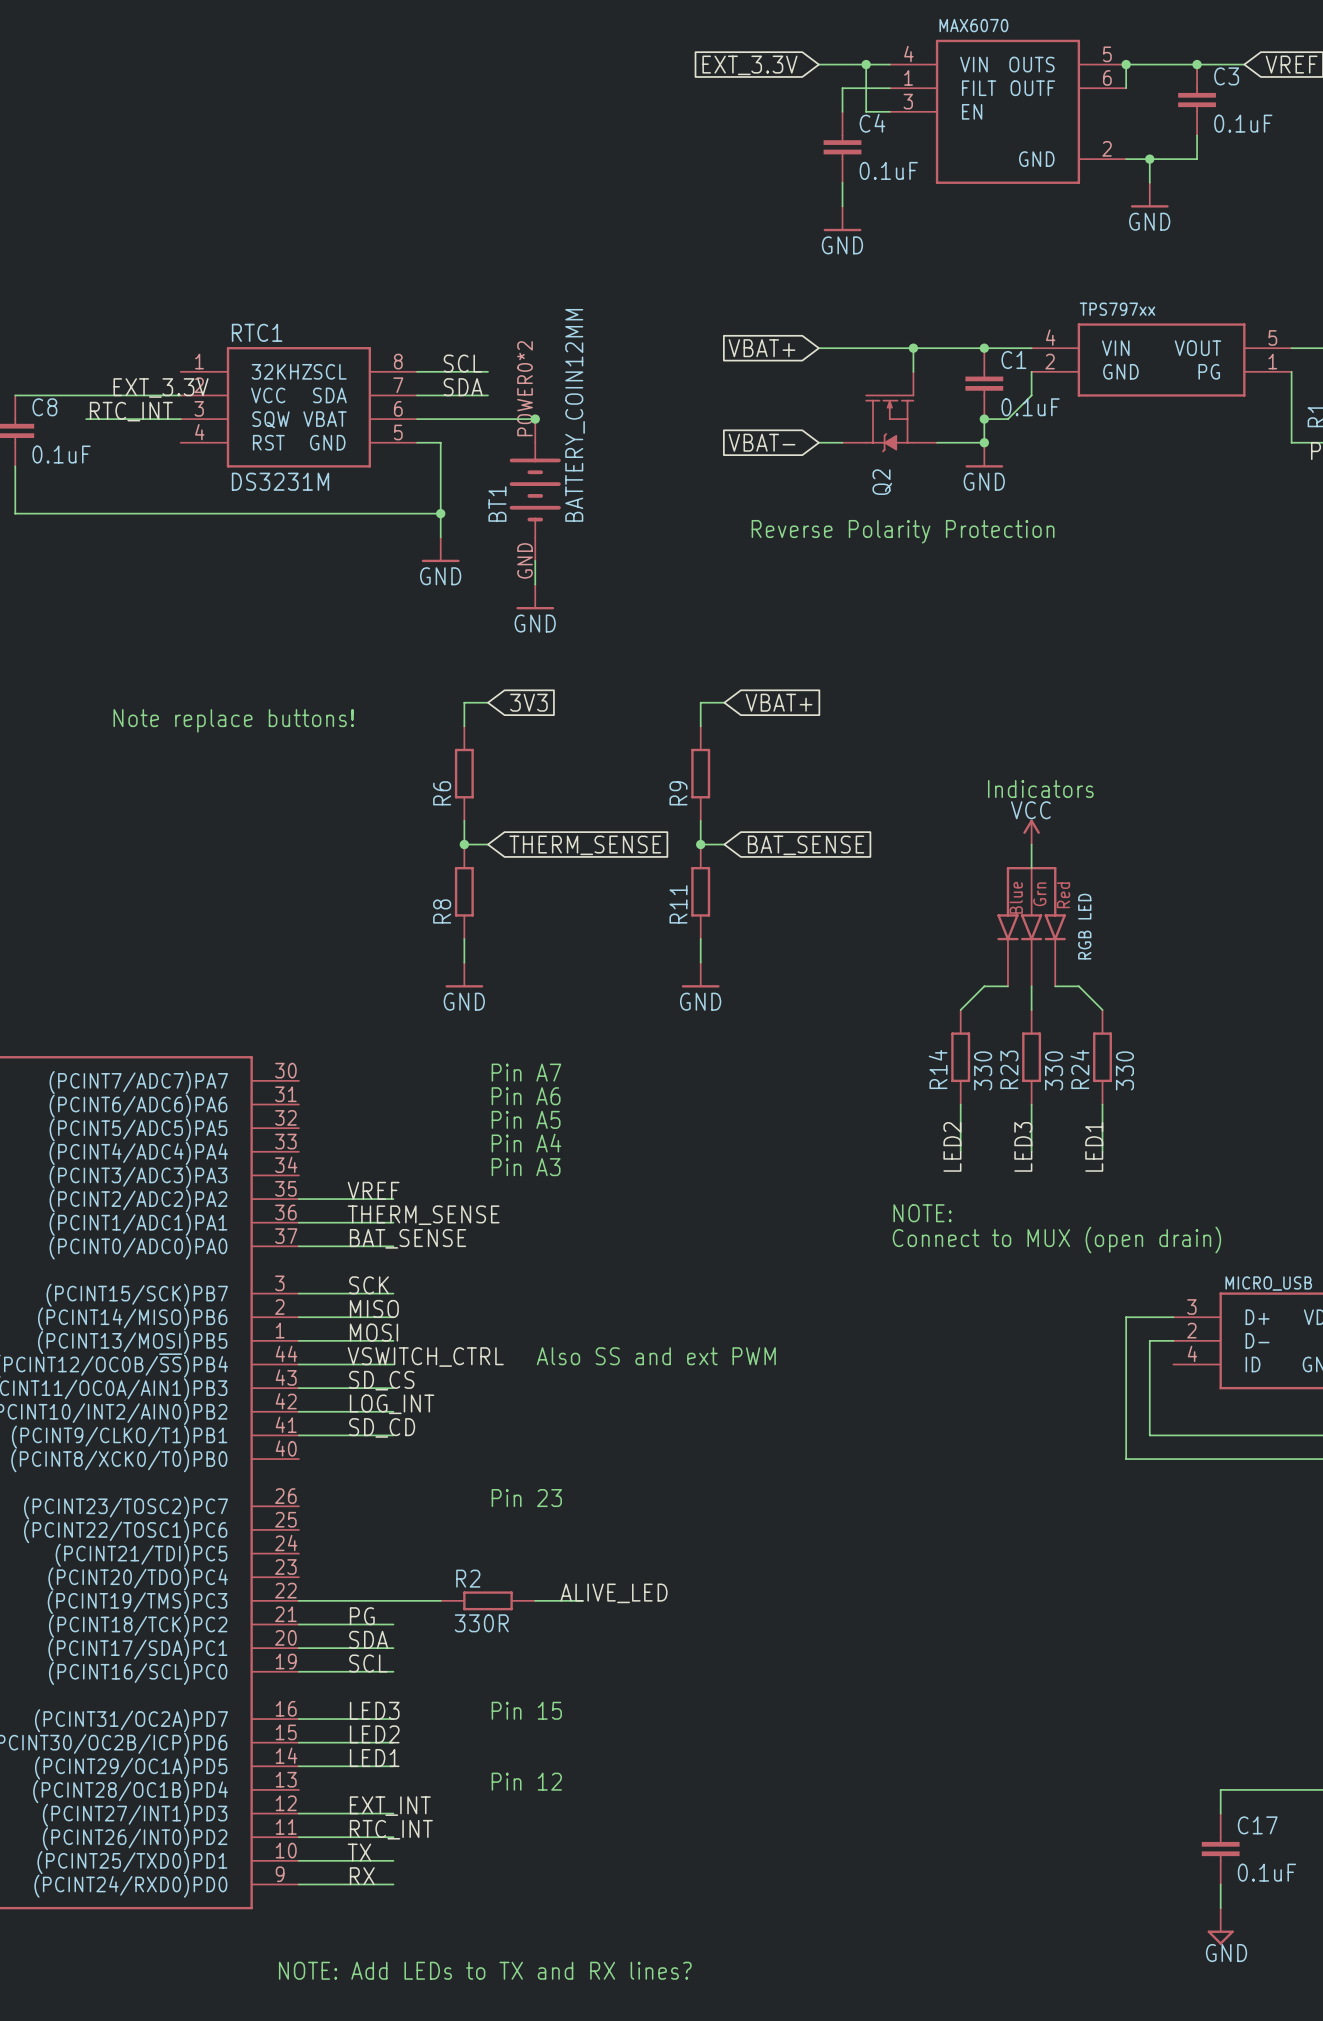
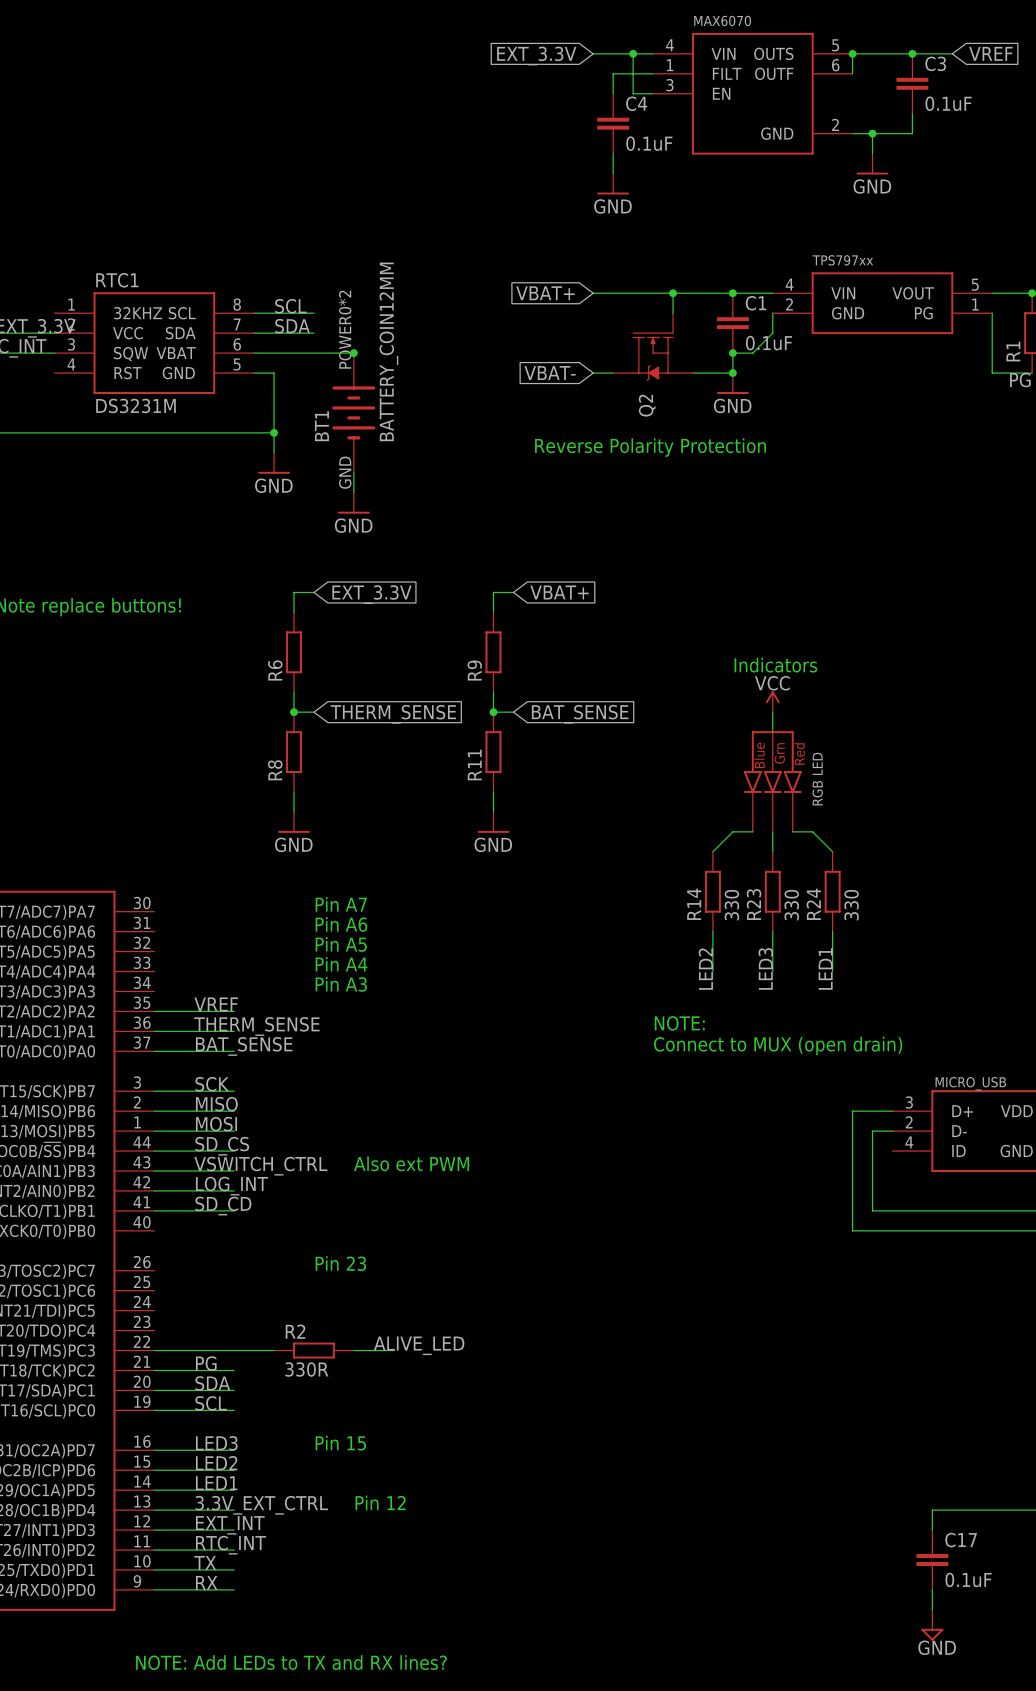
global label: 3V3 (528, 702) -> EXT_3.3V (372, 594)
text: Also SS and ext PWM (656, 1356) -> Also ext PWM (411, 1163)
label: VSWITCH_CTRL (425, 1357) -> SD_CS (222, 1146)
label: SD_CS (381, 1380) -> VSWITCH_CTRL (260, 1166)
text position: Pin 12 (526, 1781) -> Pin 12 (380, 1502)
label: none -> 3.3V_EXT_CTRL (261, 1505)
wire: none -> (154, 1510) (234, 1510)

